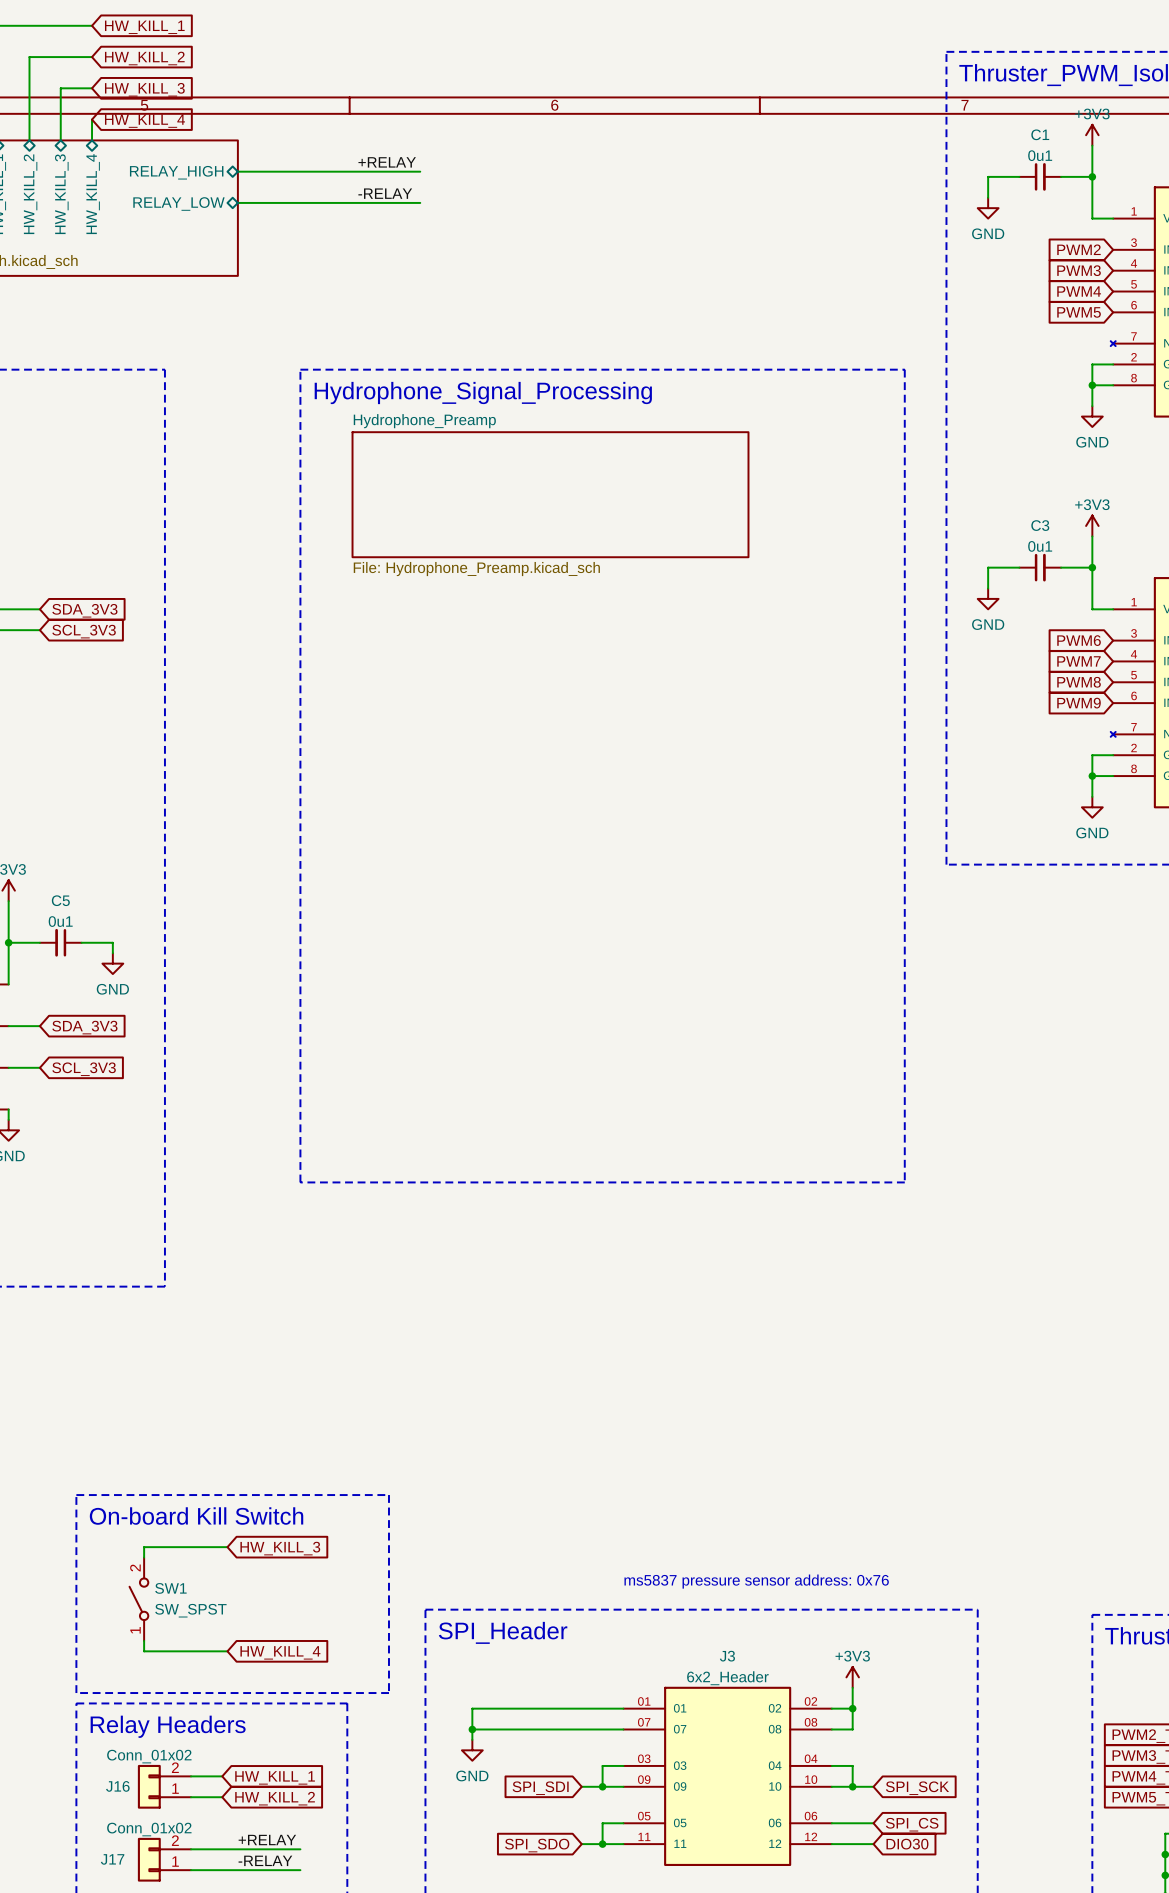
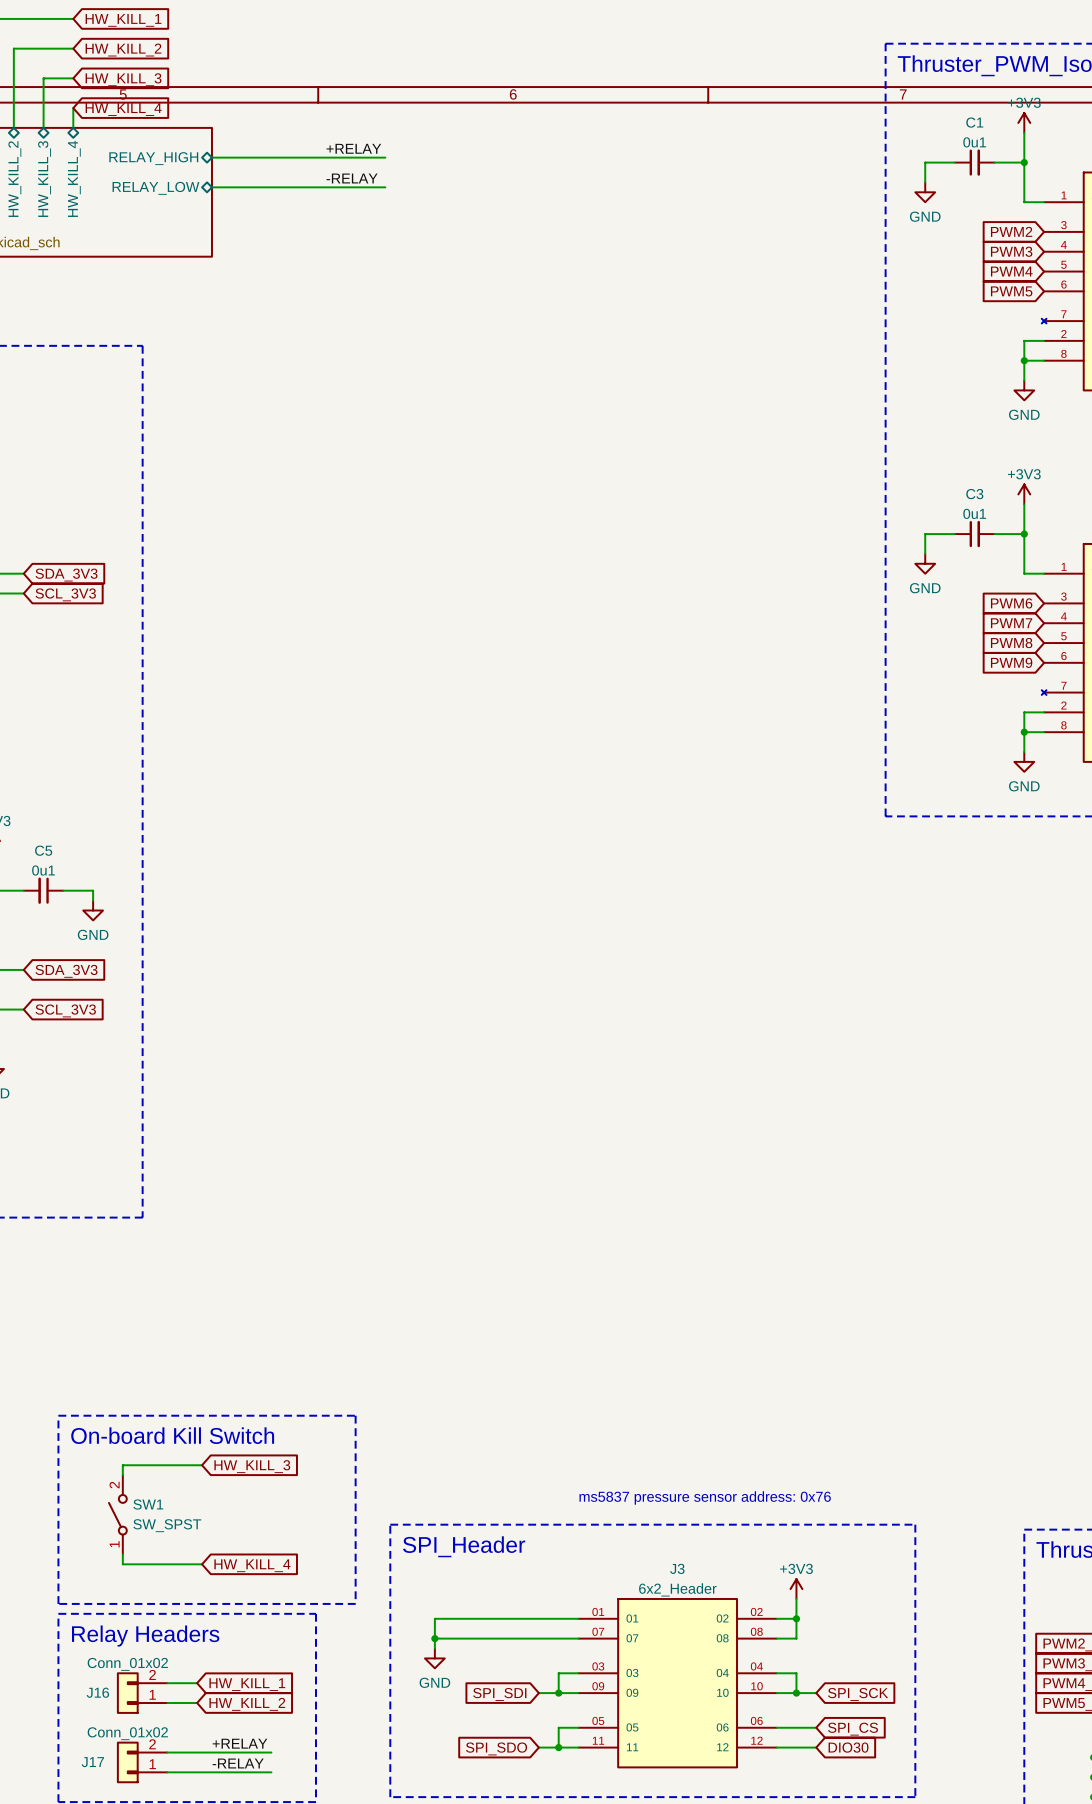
line: (300, 369) (904, 369) (904, 1182) (300, 1182) (300, 369) -> none
text: Hydrophone_Signal_Processing (483, 393) -> none
sheet Hydrophone_Preamp: File: Hydrophone_Preamp.kicad_sch (550, 494) -> none

